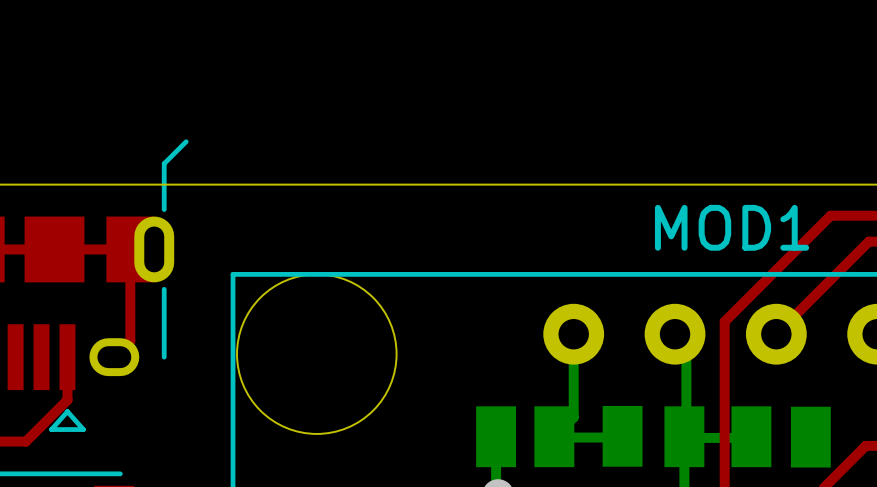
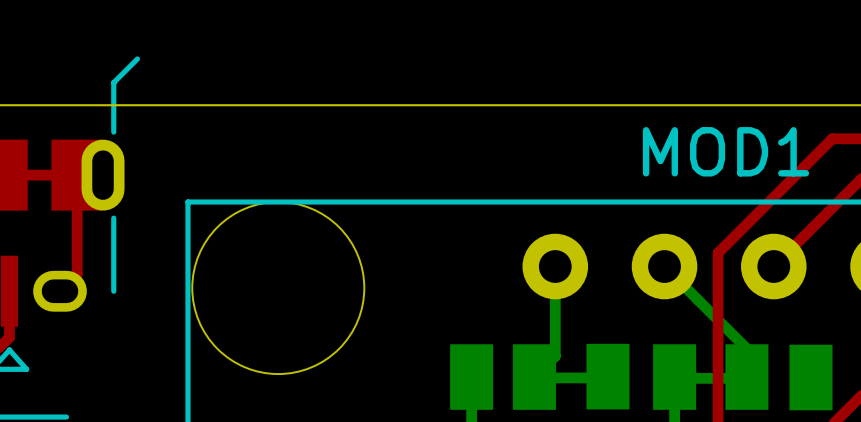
bottom track: (686, 345) (686, 418) -> (676, 278) (746, 348) (746, 377)

